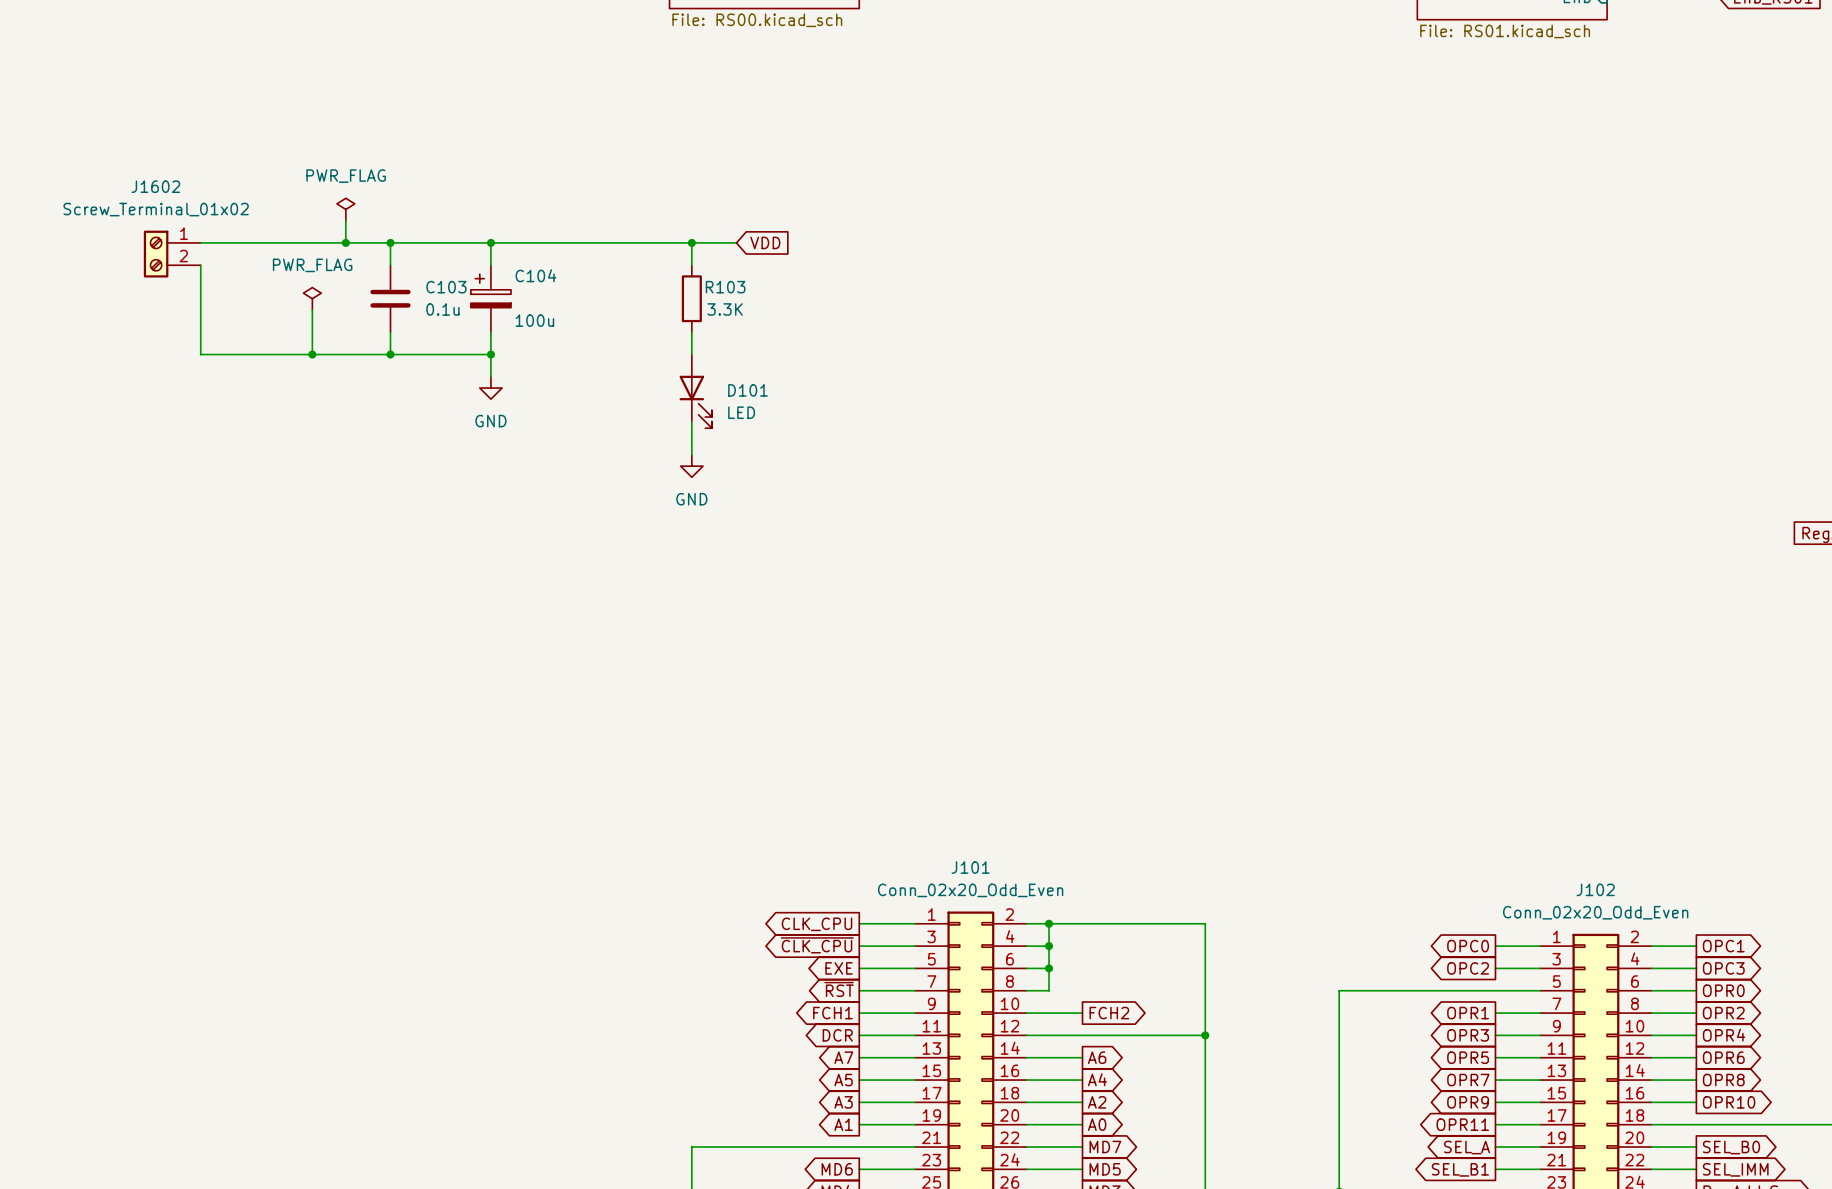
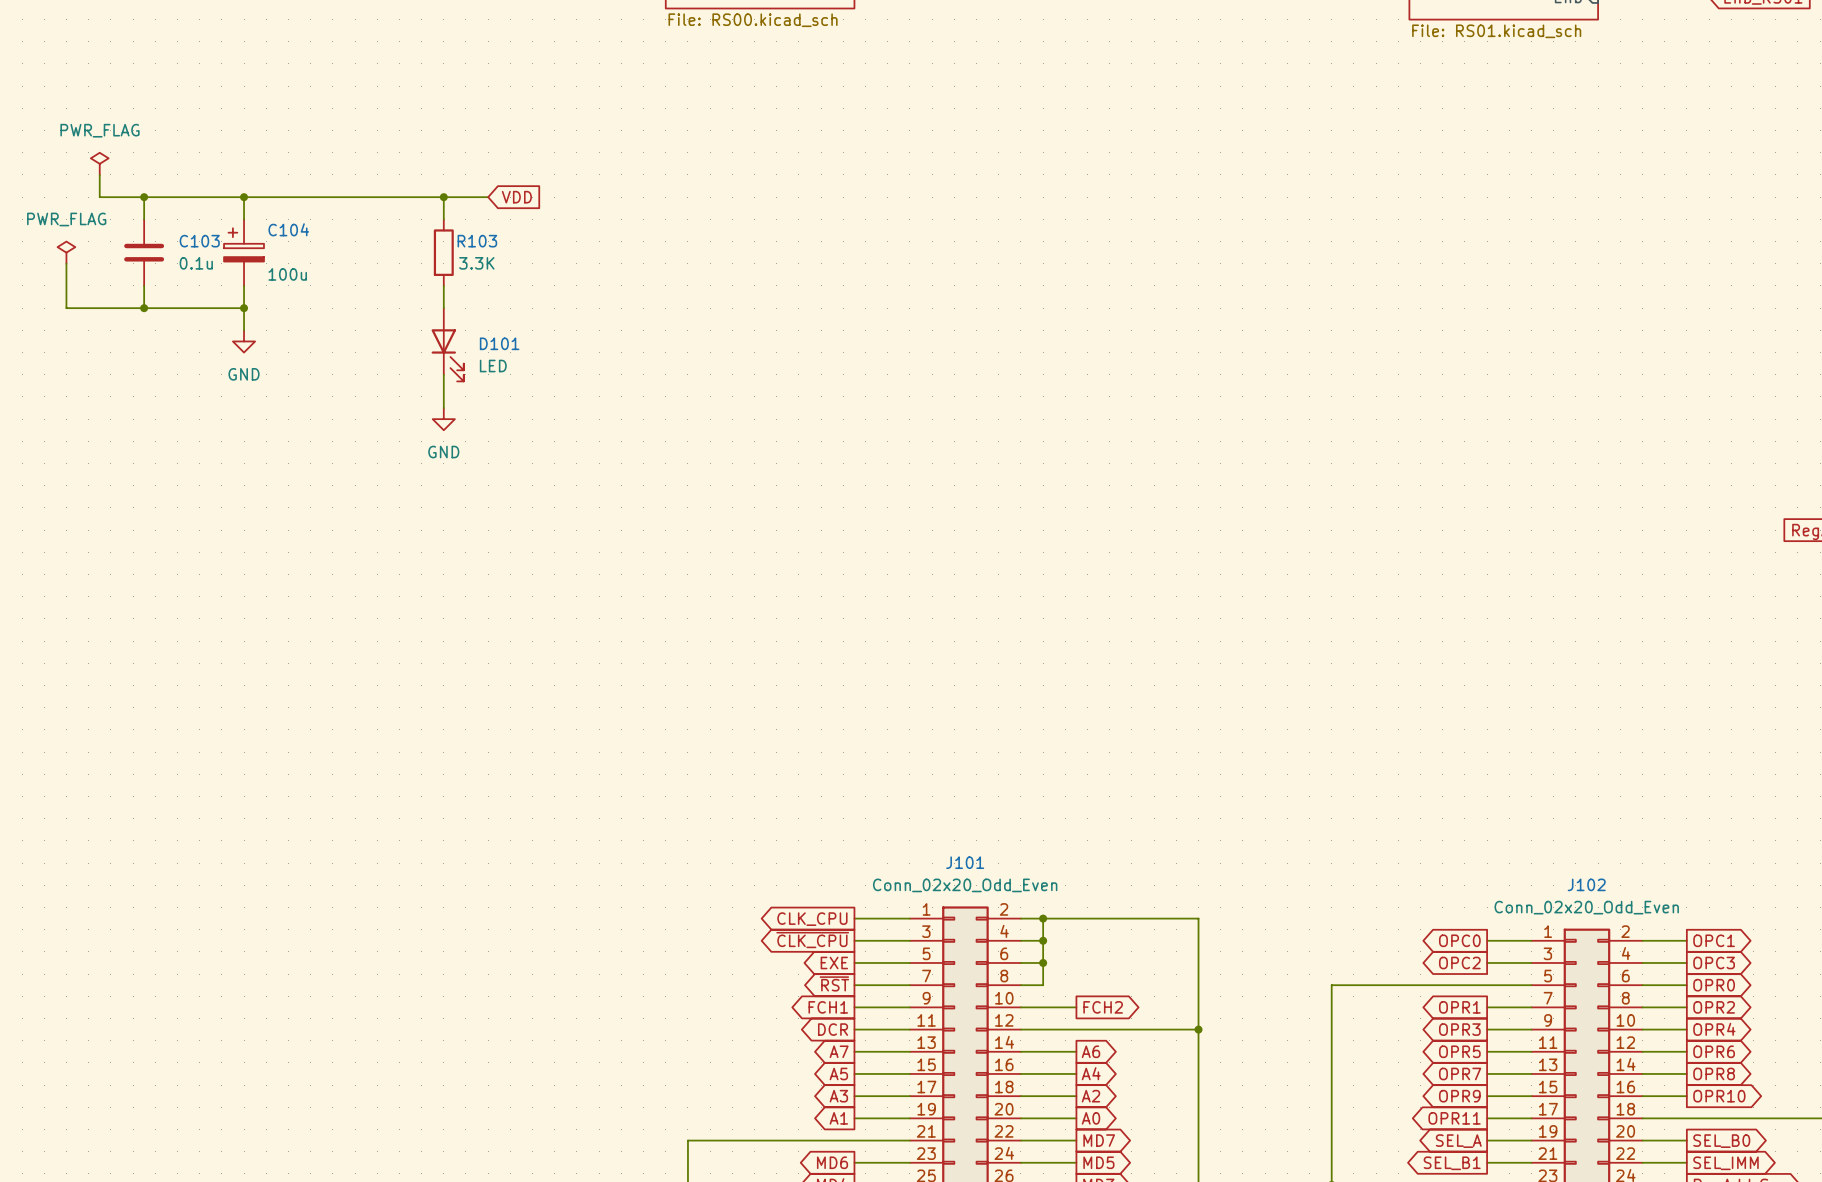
power symbol: none -> PWR_FLAG (99, 163)
wire: none -> (99, 174) (99, 197) (488, 197)
wire: none -> (144, 197) (144, 219)
junction: none -> (144, 197)
junction: none -> (244, 197)
junction: none -> (443, 197)
global label: none -> VDD (516, 197)
power symbol: PWR_FLAG (345, 209) -> none
wire: (345, 220) (345, 242) -> (244, 197) (244, 219)
wire: (200, 242) (736, 242) -> none
junction: (345, 242) -> none
wire: (390, 242) (390, 265) -> (443, 197) (443, 219)
junction: (390, 242) -> none
wire: (490, 242) (490, 265) -> none
junction: (490, 242) -> none
wire: (691, 242) (691, 265) -> none
junction: (691, 242) -> none
global label: VDD (765, 242) -> none
power symbol: none -> PWR_FLAG (66, 252)
J1602: Screw_Terminal_01x02 (172, 254) -> none
wire: none -> (66, 263) (66, 308) (244, 308)
wire: (200, 265) (200, 354) (490, 354) -> none
wire: none -> (144, 285) (144, 308)
power symbol: PWR_FLAG (312, 298) -> none
C103 position: (390, 298) -> (144, 252)
C104 position: (490, 298) -> (244, 252)
R103 position: (691, 298) -> (443, 252)
junction: none -> (144, 308)
junction: none -> (244, 308)
wire: (312, 309) (312, 354) -> (244, 285) (244, 330)
wire: (390, 332) (390, 354) -> (443, 285) (443, 308)
wire: (490, 332) (490, 376) -> none
wire: (691, 332) (691, 354) -> none
power symbol: none -> GND (244, 341)
junction: (312, 354) -> none
junction: (390, 354) -> none
junction: (490, 354) -> none
wire: none -> (443, 374) (443, 408)
power symbol position: GND (490, 388) -> GND (443, 419)
D101 position: (695, 391) -> (447, 344)
wire: (691, 421) (691, 454) -> none
power symbol: GND (691, 466) -> none

